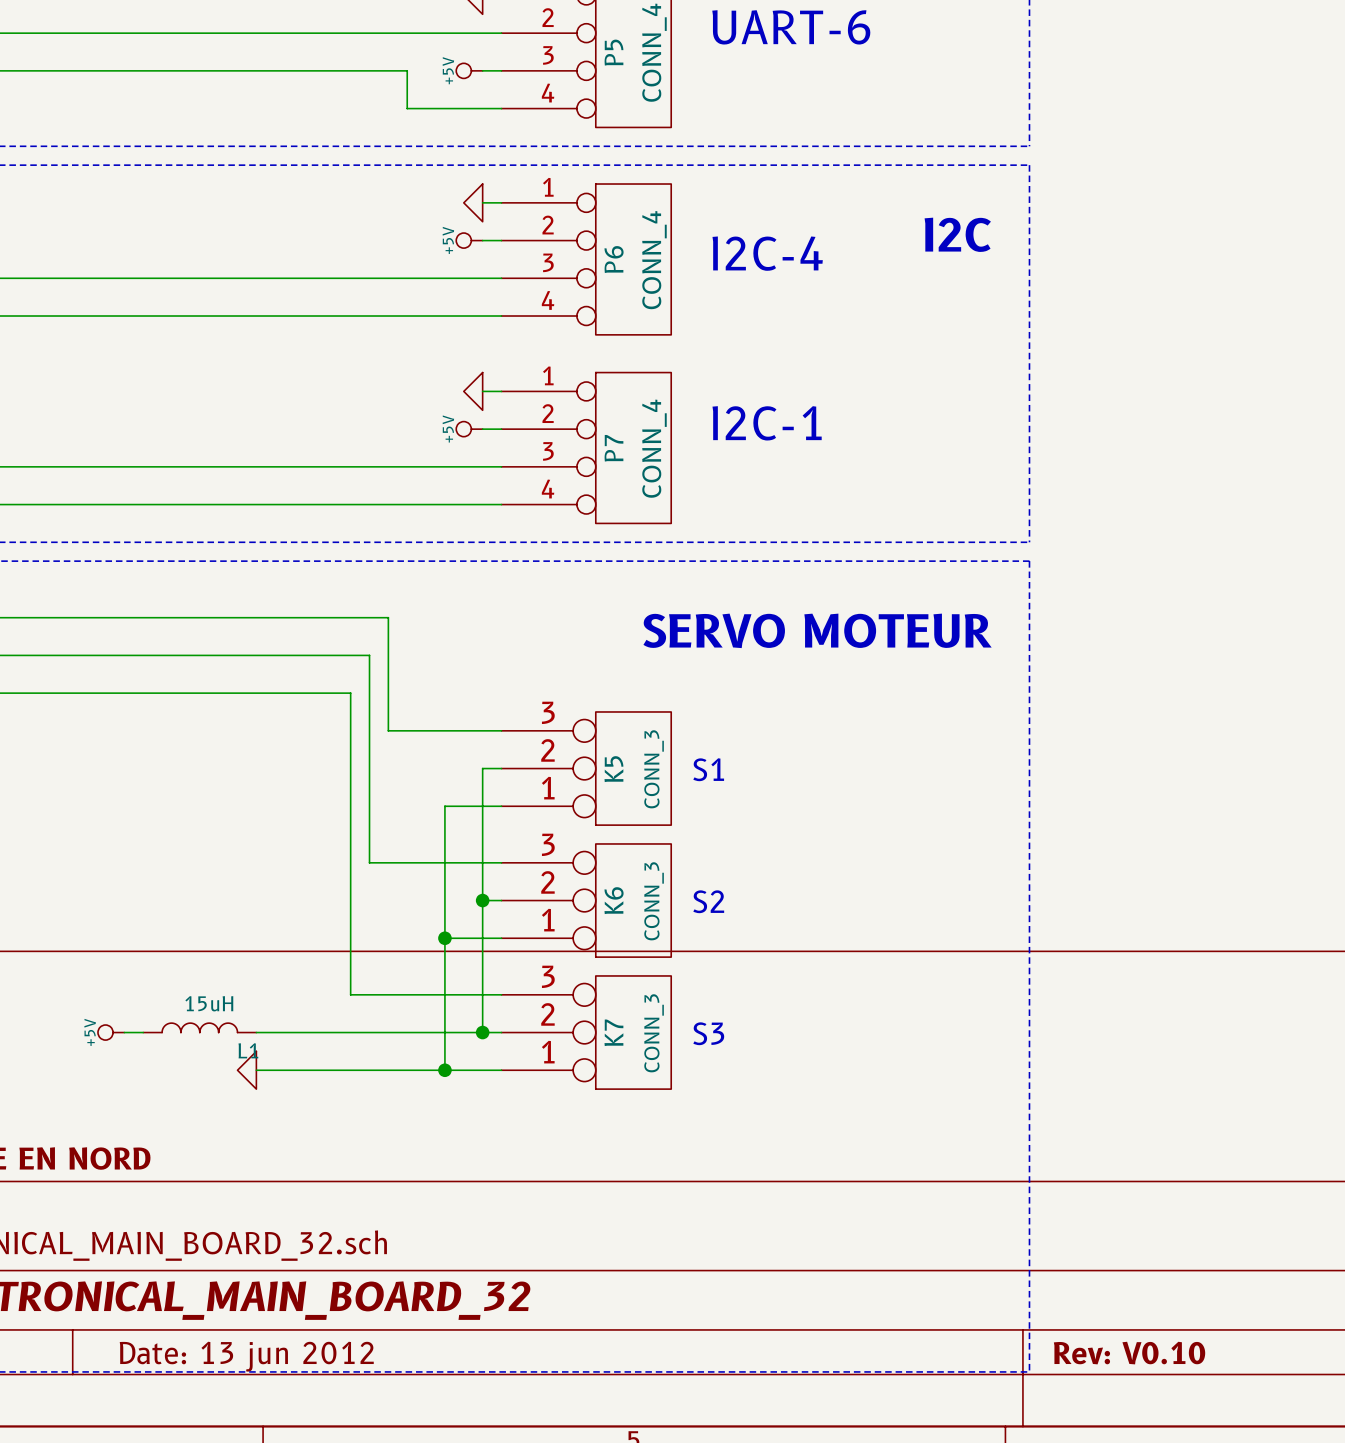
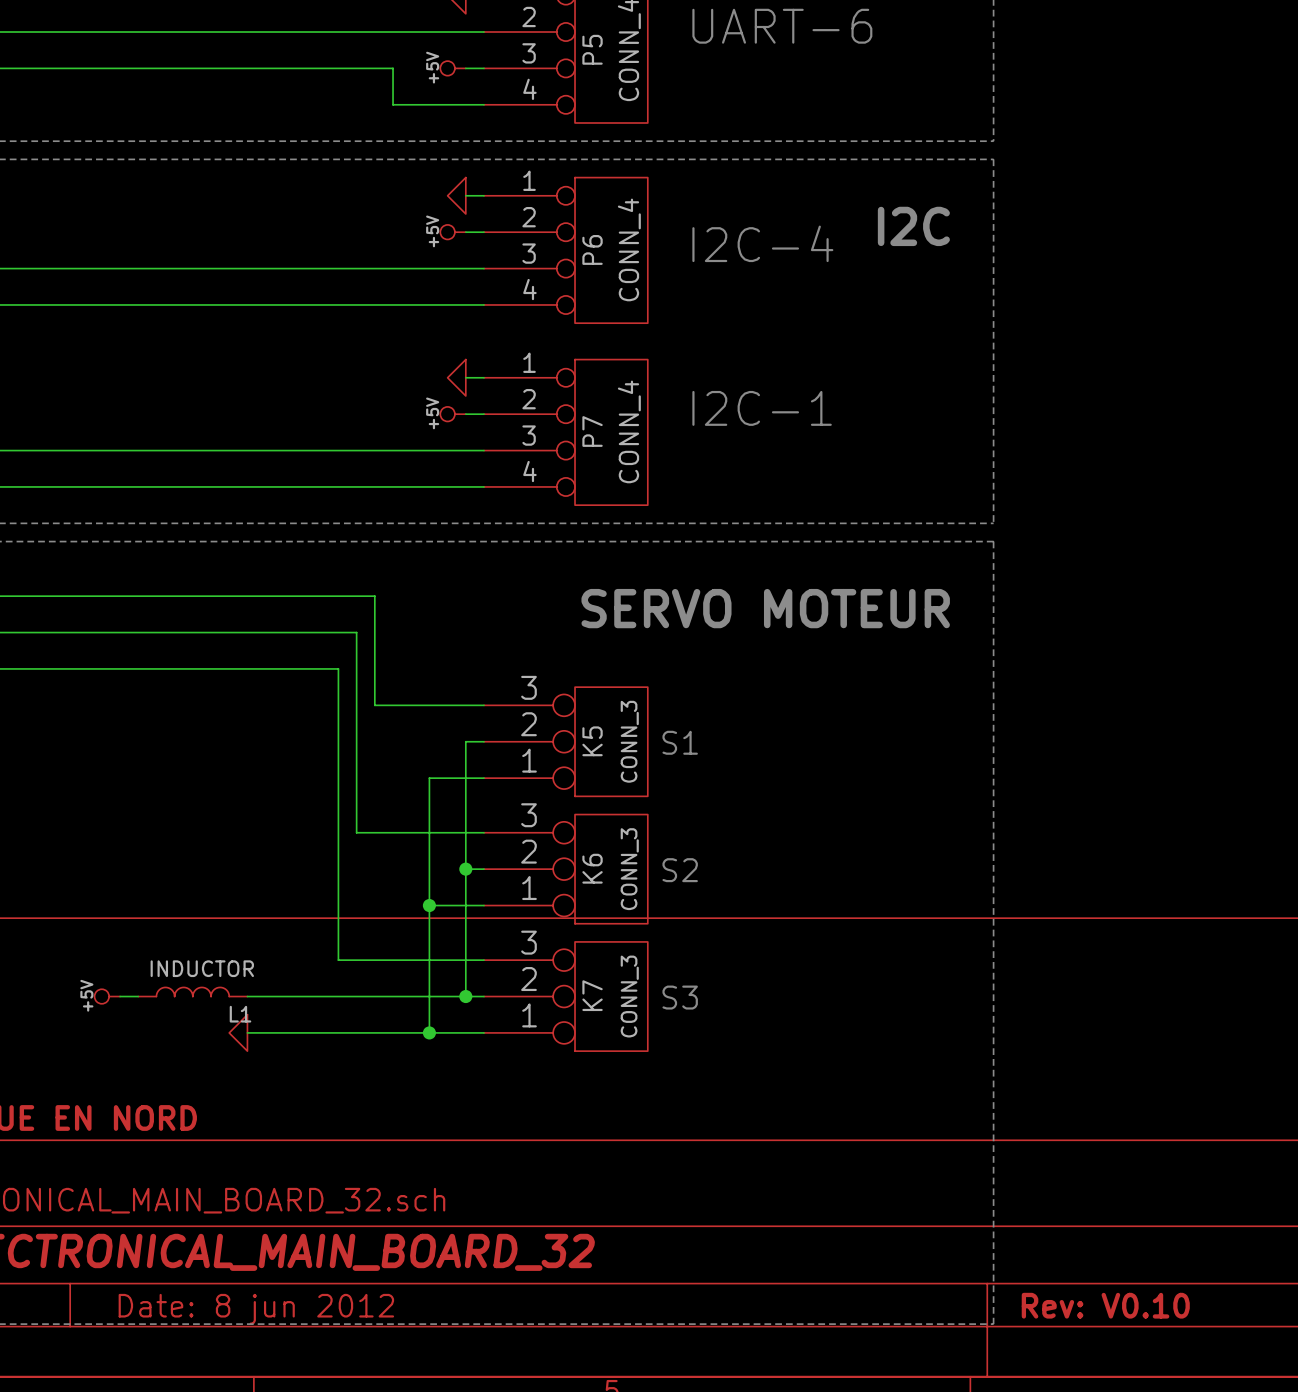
L1 value: 15uH (209, 1003) -> INDUCTOR (202, 968)
title block: Date: 13 jun 2012 (246, 1356) -> Date: 8 jun 2012 (256, 1309)

